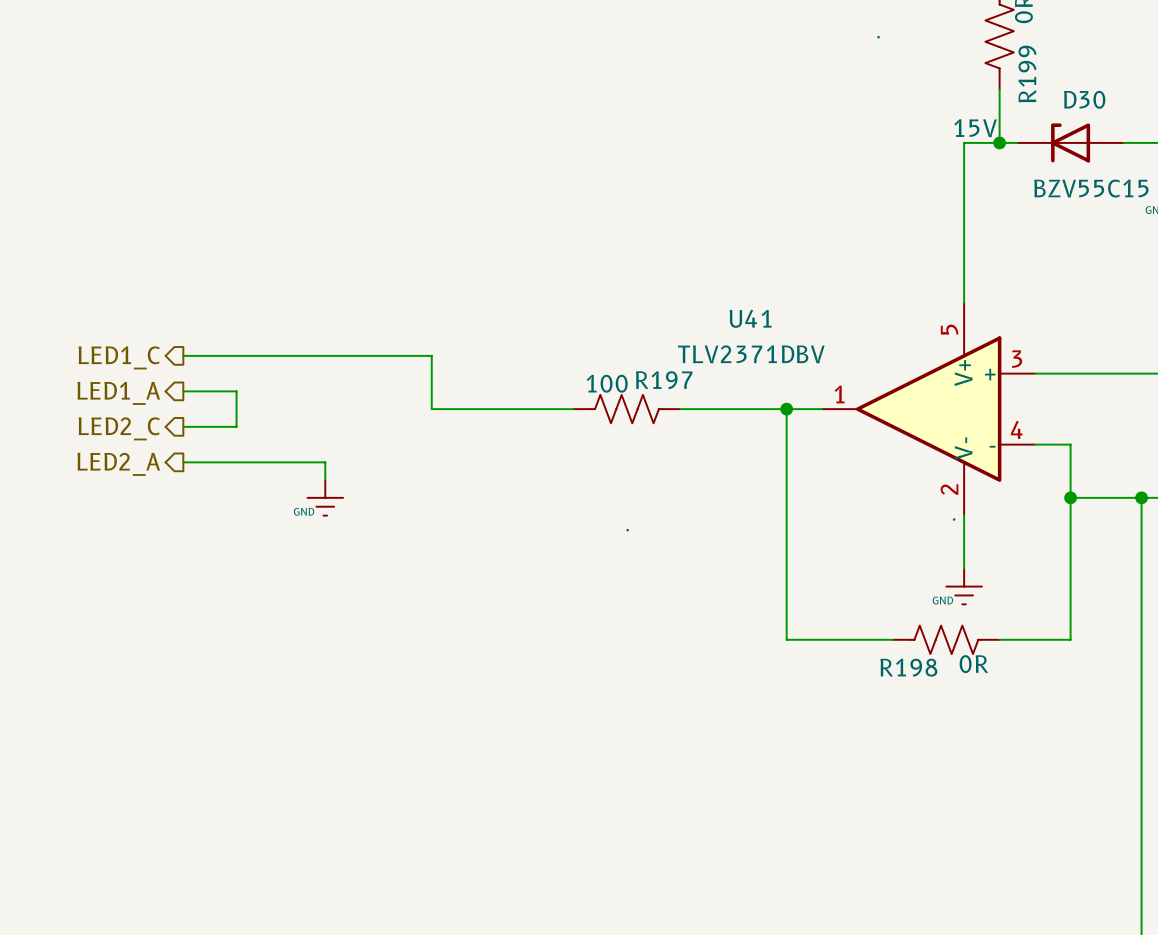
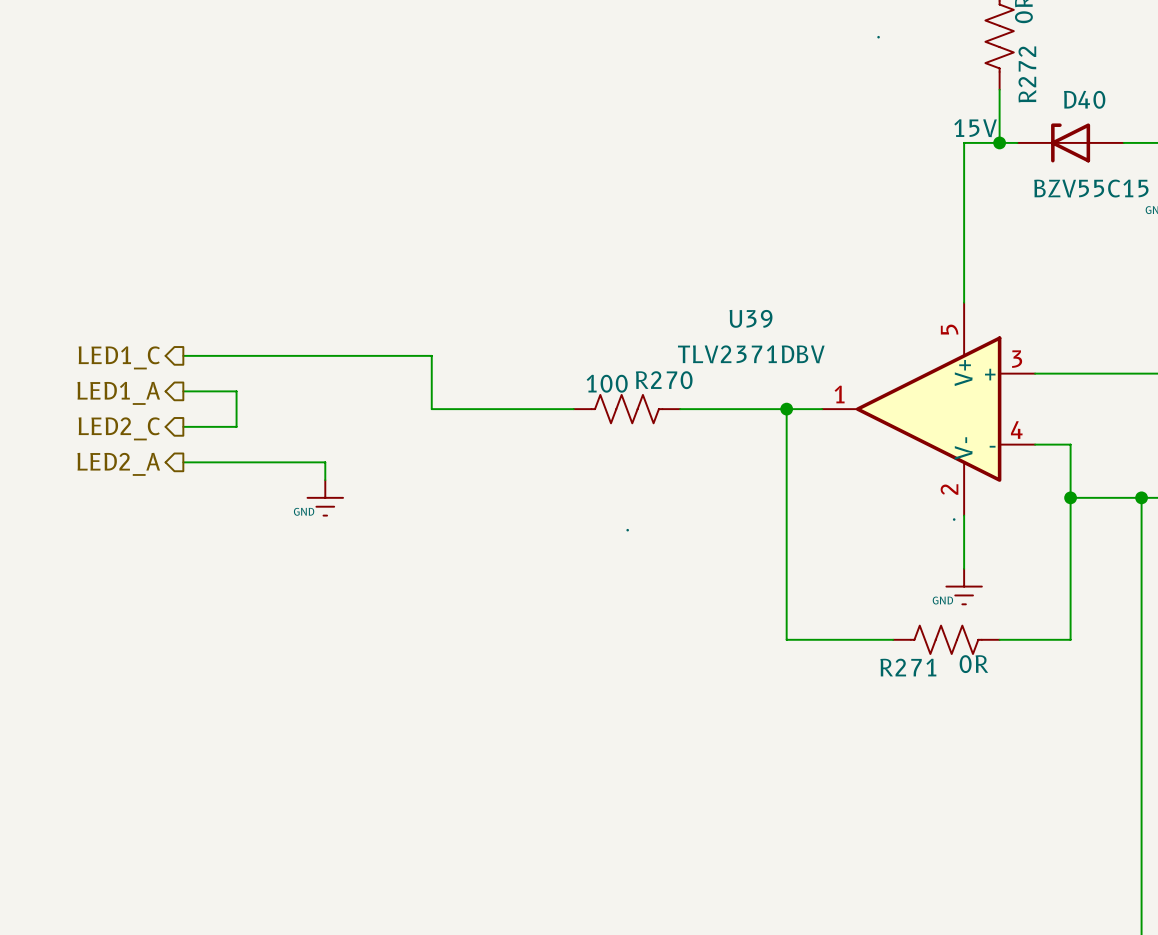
R199 name: R199 (1027, 74) -> R272 (1027, 74)
D30 name: D30 (1084, 99) -> D40 (1084, 99)
U41 name: U41 (750, 318) -> U39 (751, 318)
R197 name: R197 (664, 380) -> R270 (664, 380)
R198 name: R198 (908, 667) -> R271 (908, 667)

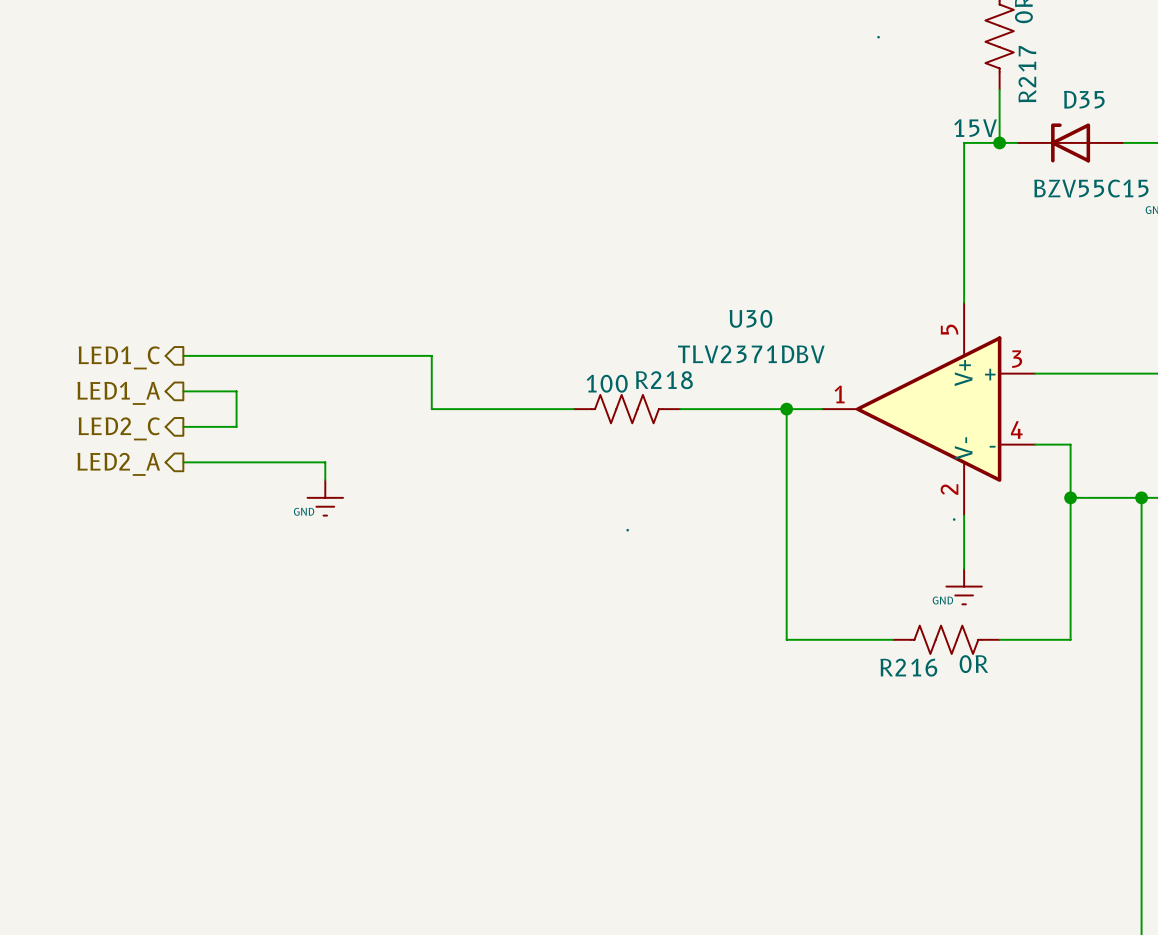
R272 name: R272 (1027, 74) -> R217 (1027, 74)
D40 name: D40 (1084, 99) -> D35 (1084, 99)
U39 name: U39 (751, 318) -> U30 (750, 318)
R270 name: R270 (664, 380) -> R218 (664, 380)
R271 name: R271 (908, 667) -> R216 (908, 667)

